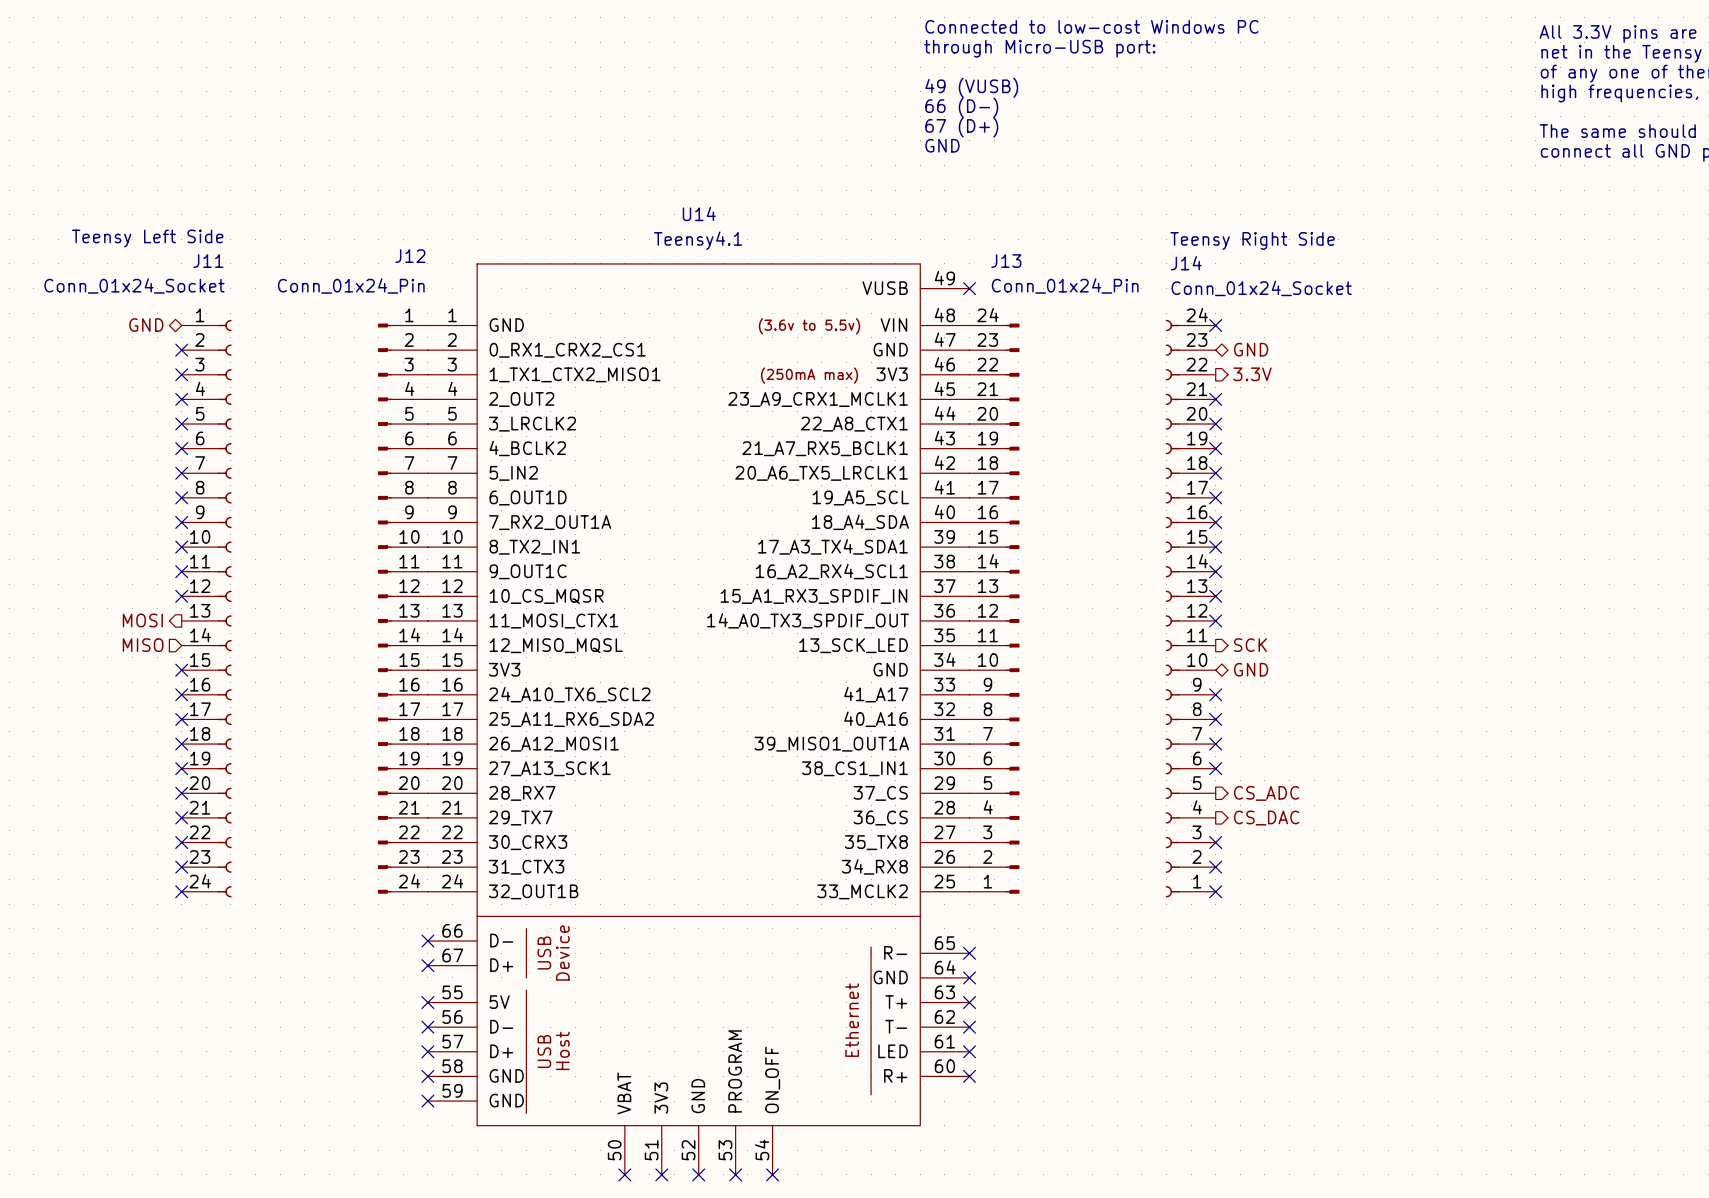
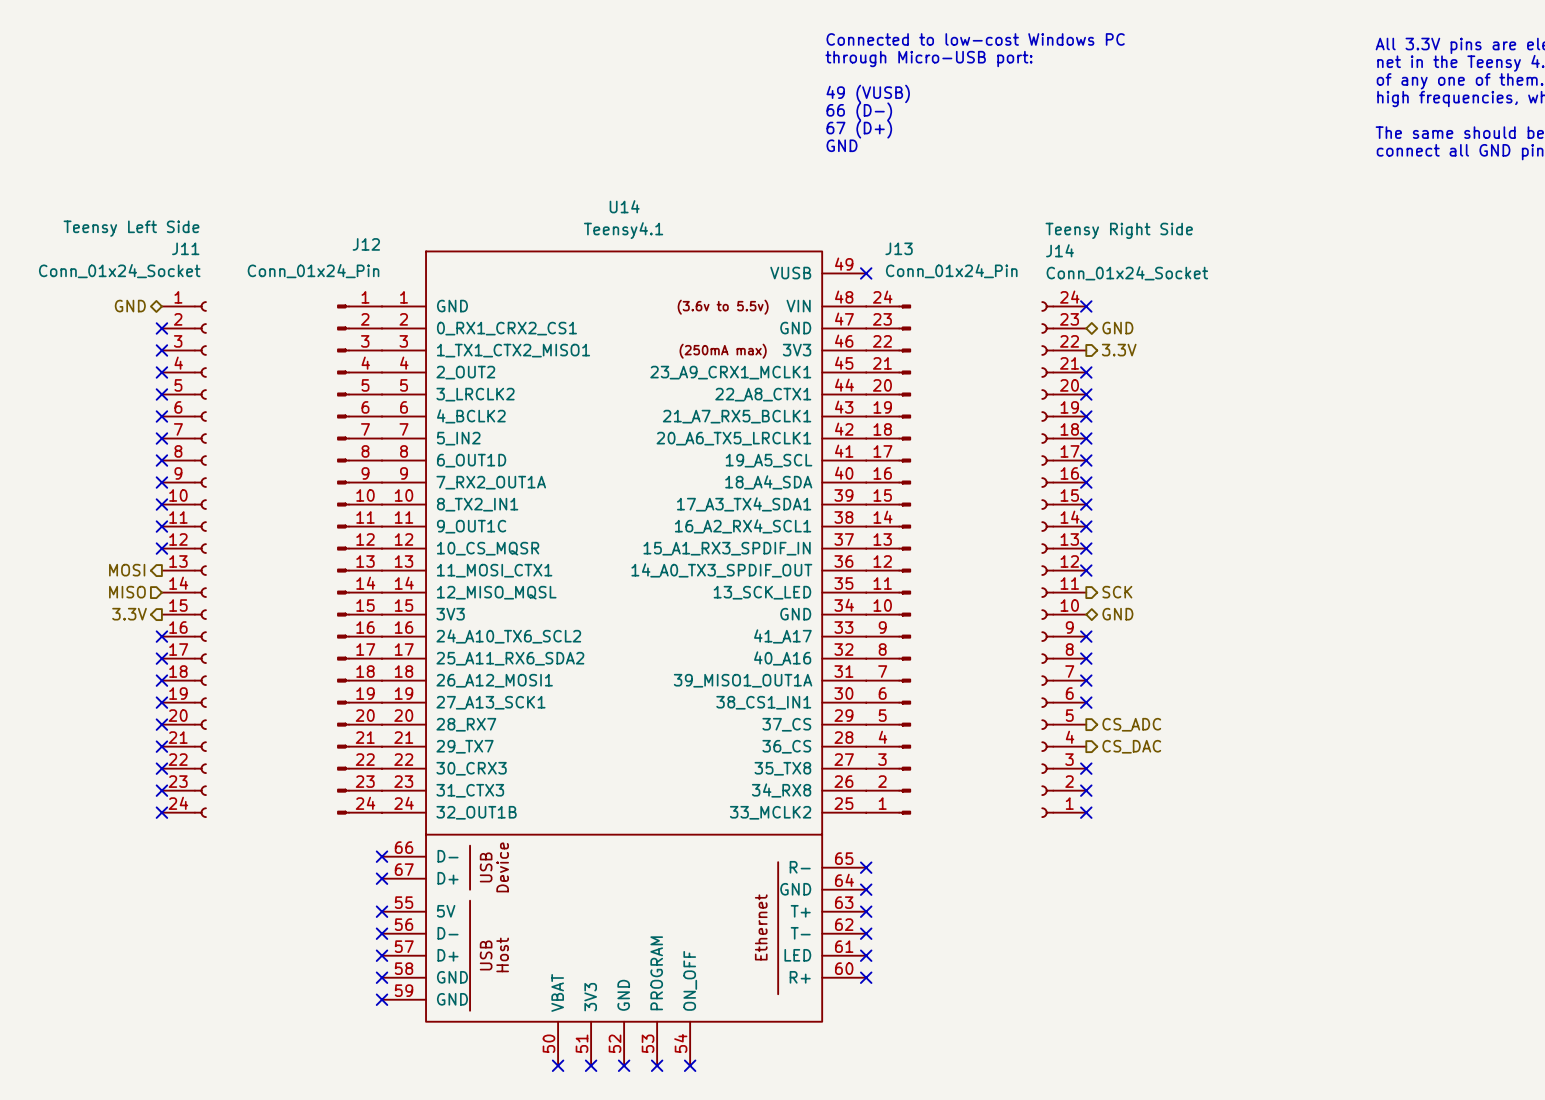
hierarchical label: none -> 3.3V (129, 614)
no-connect mark: (181, 670) -> none

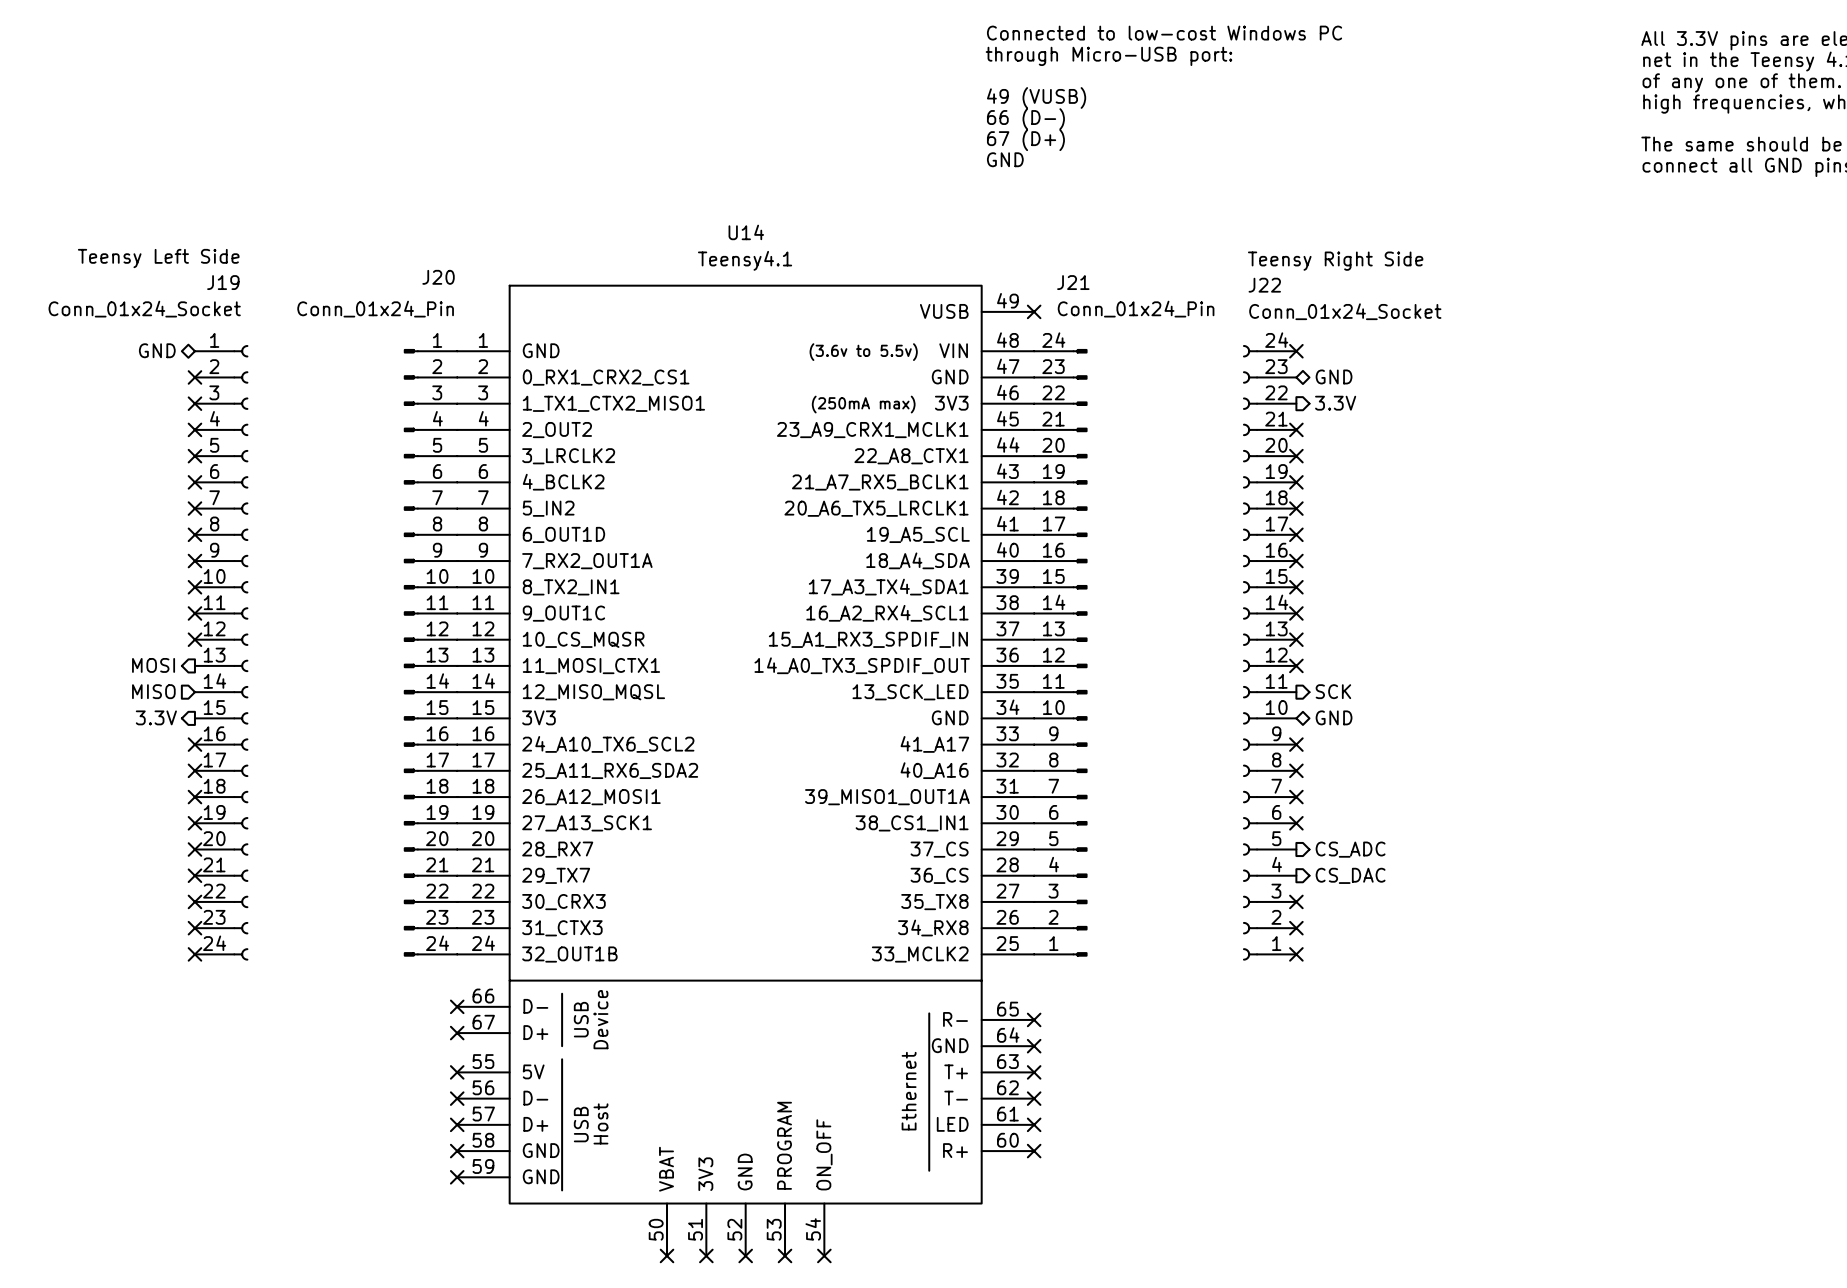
J12 name: J12 (366, 244) -> J20 (438, 277)
J11 name: J11 (185, 248) -> J19 (223, 282)
J13 name: J13 (899, 248) -> J21 (1073, 282)
J14 name: J14 (1060, 250) -> J22 (1264, 285)

